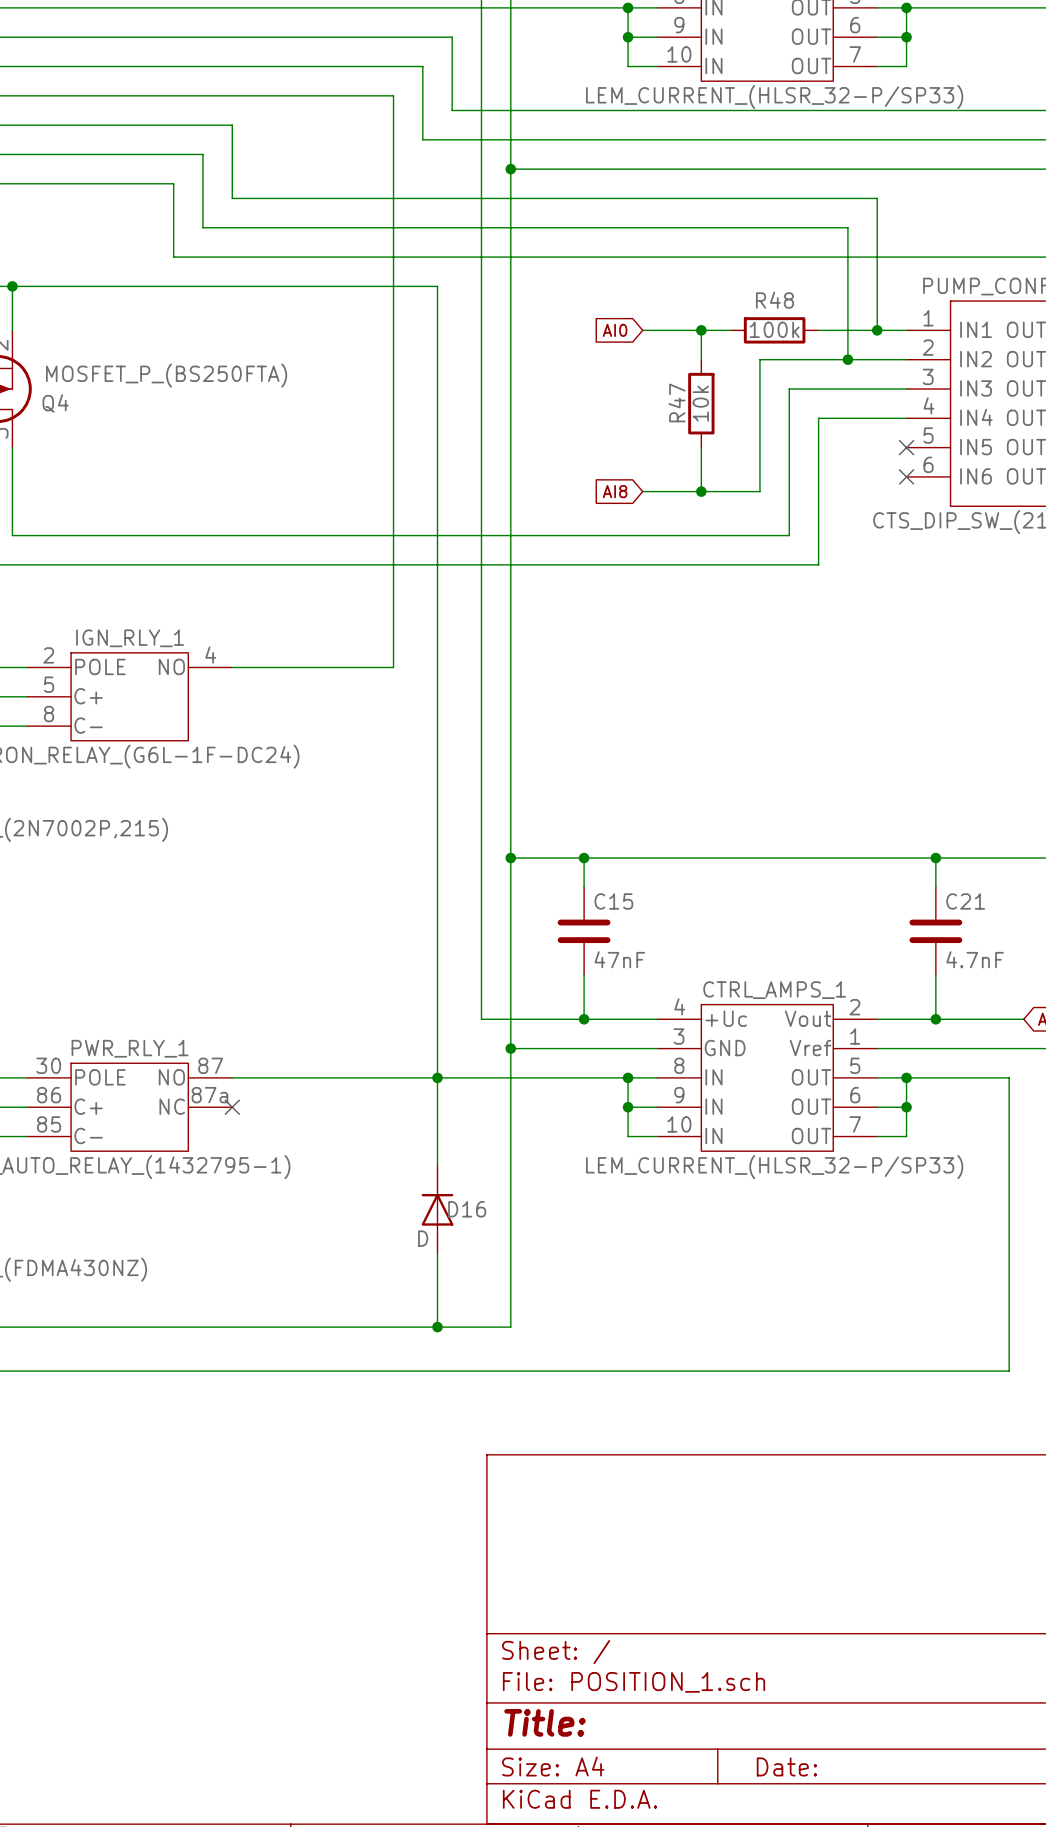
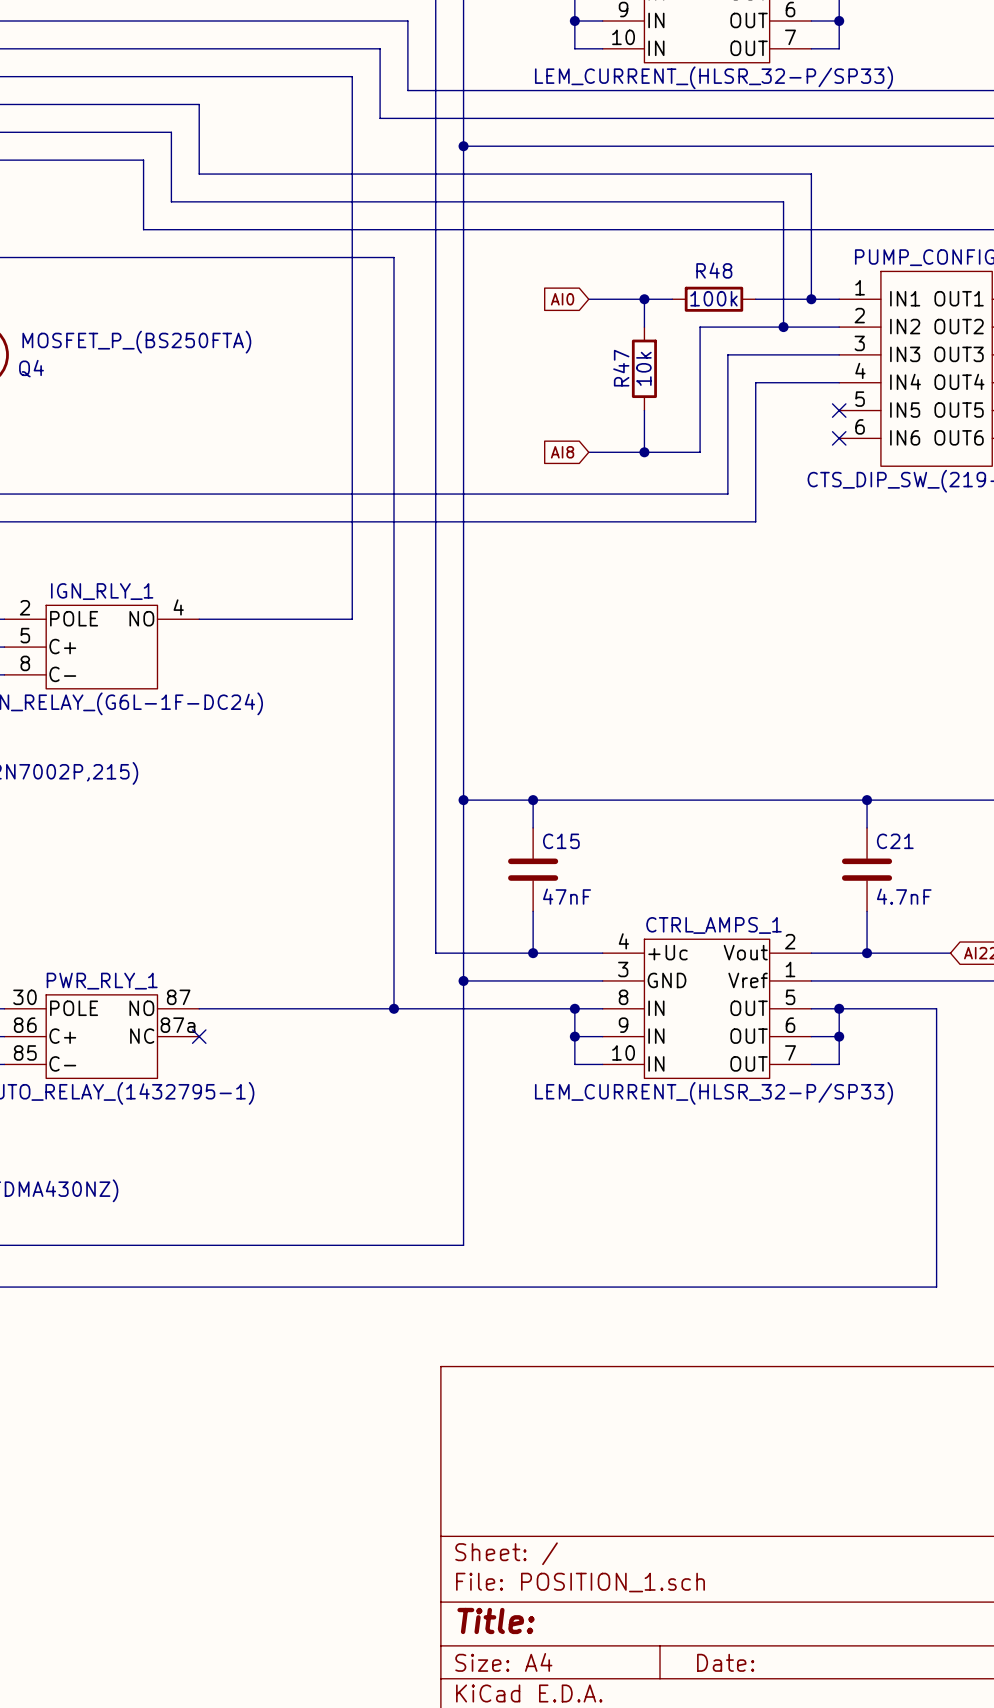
wire: (437, 1077) (437, 1165) -> none
D16: D (437, 1209) -> none
wire: (437, 1253) (437, 1327) -> none
junction: (437, 1327) -> none

